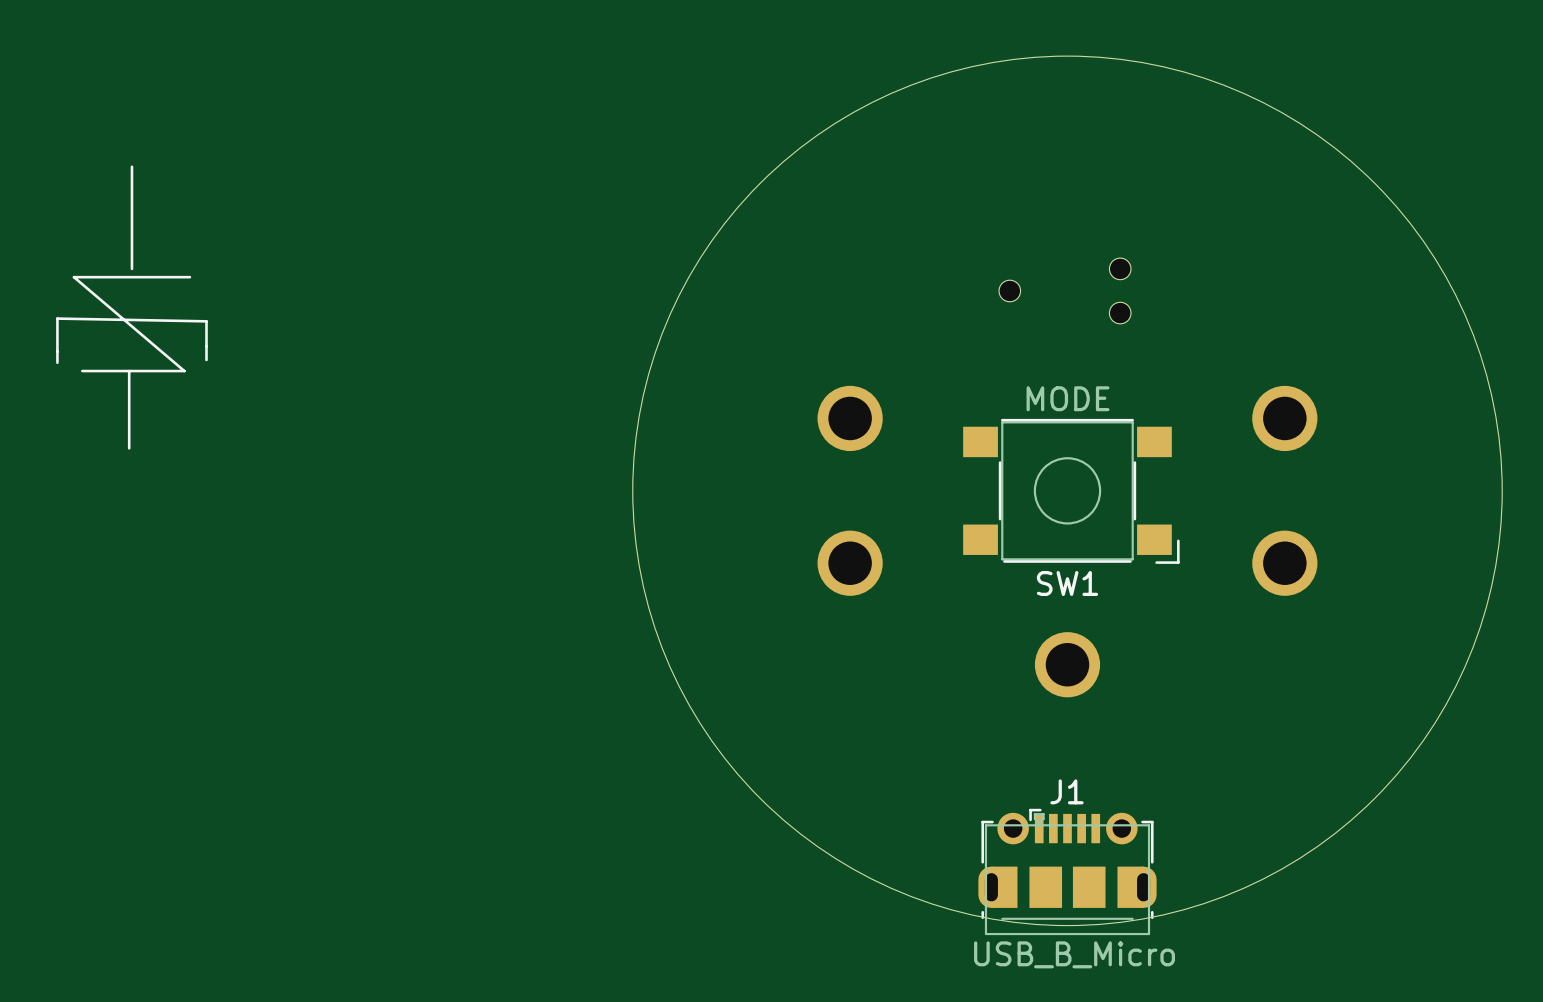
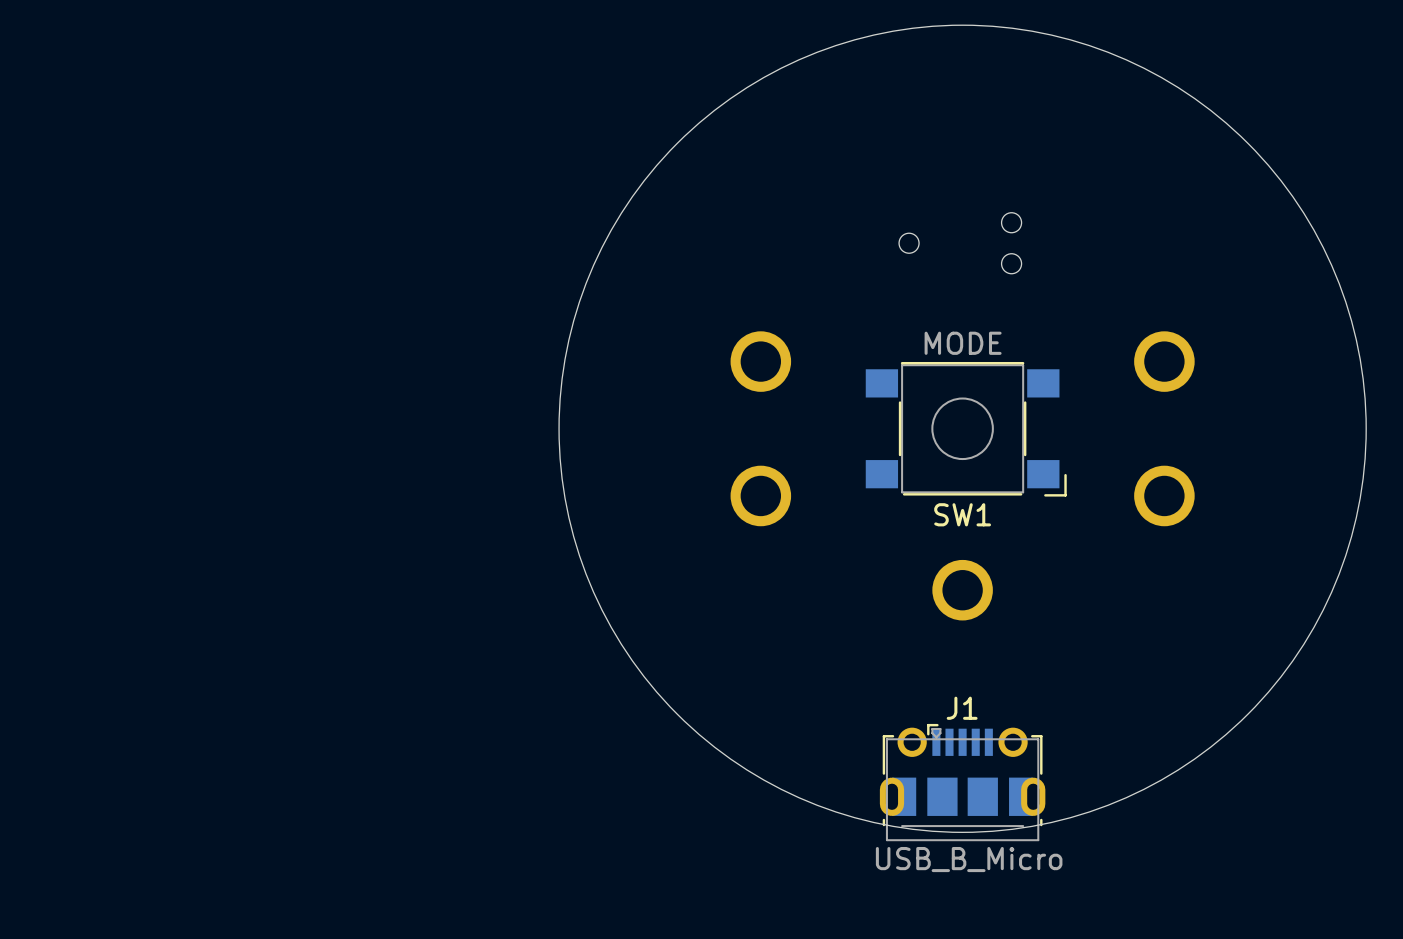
line: (131, 166) (131, 268) -> none
line: (189, 277) (73, 277) (184, 371) (82, 371) -> none
line: (206, 359) (206, 321) (57, 318) (57, 362) -> none
line: (129, 371) (129, 448) -> none

